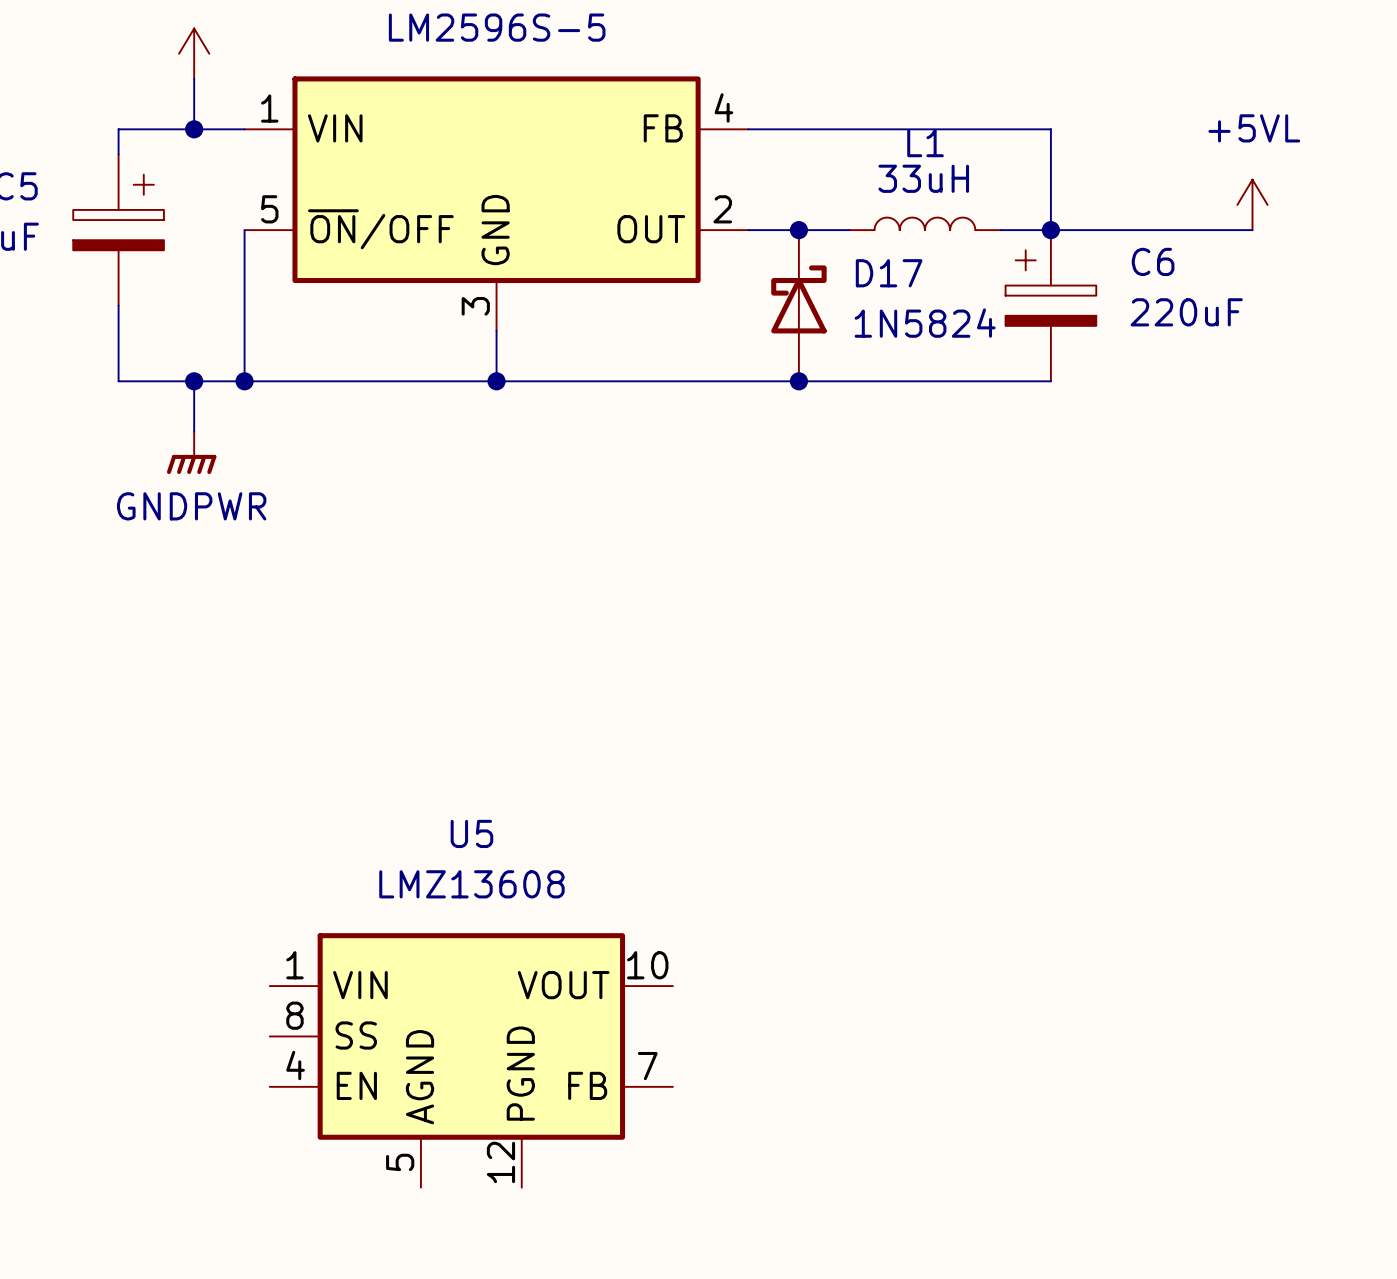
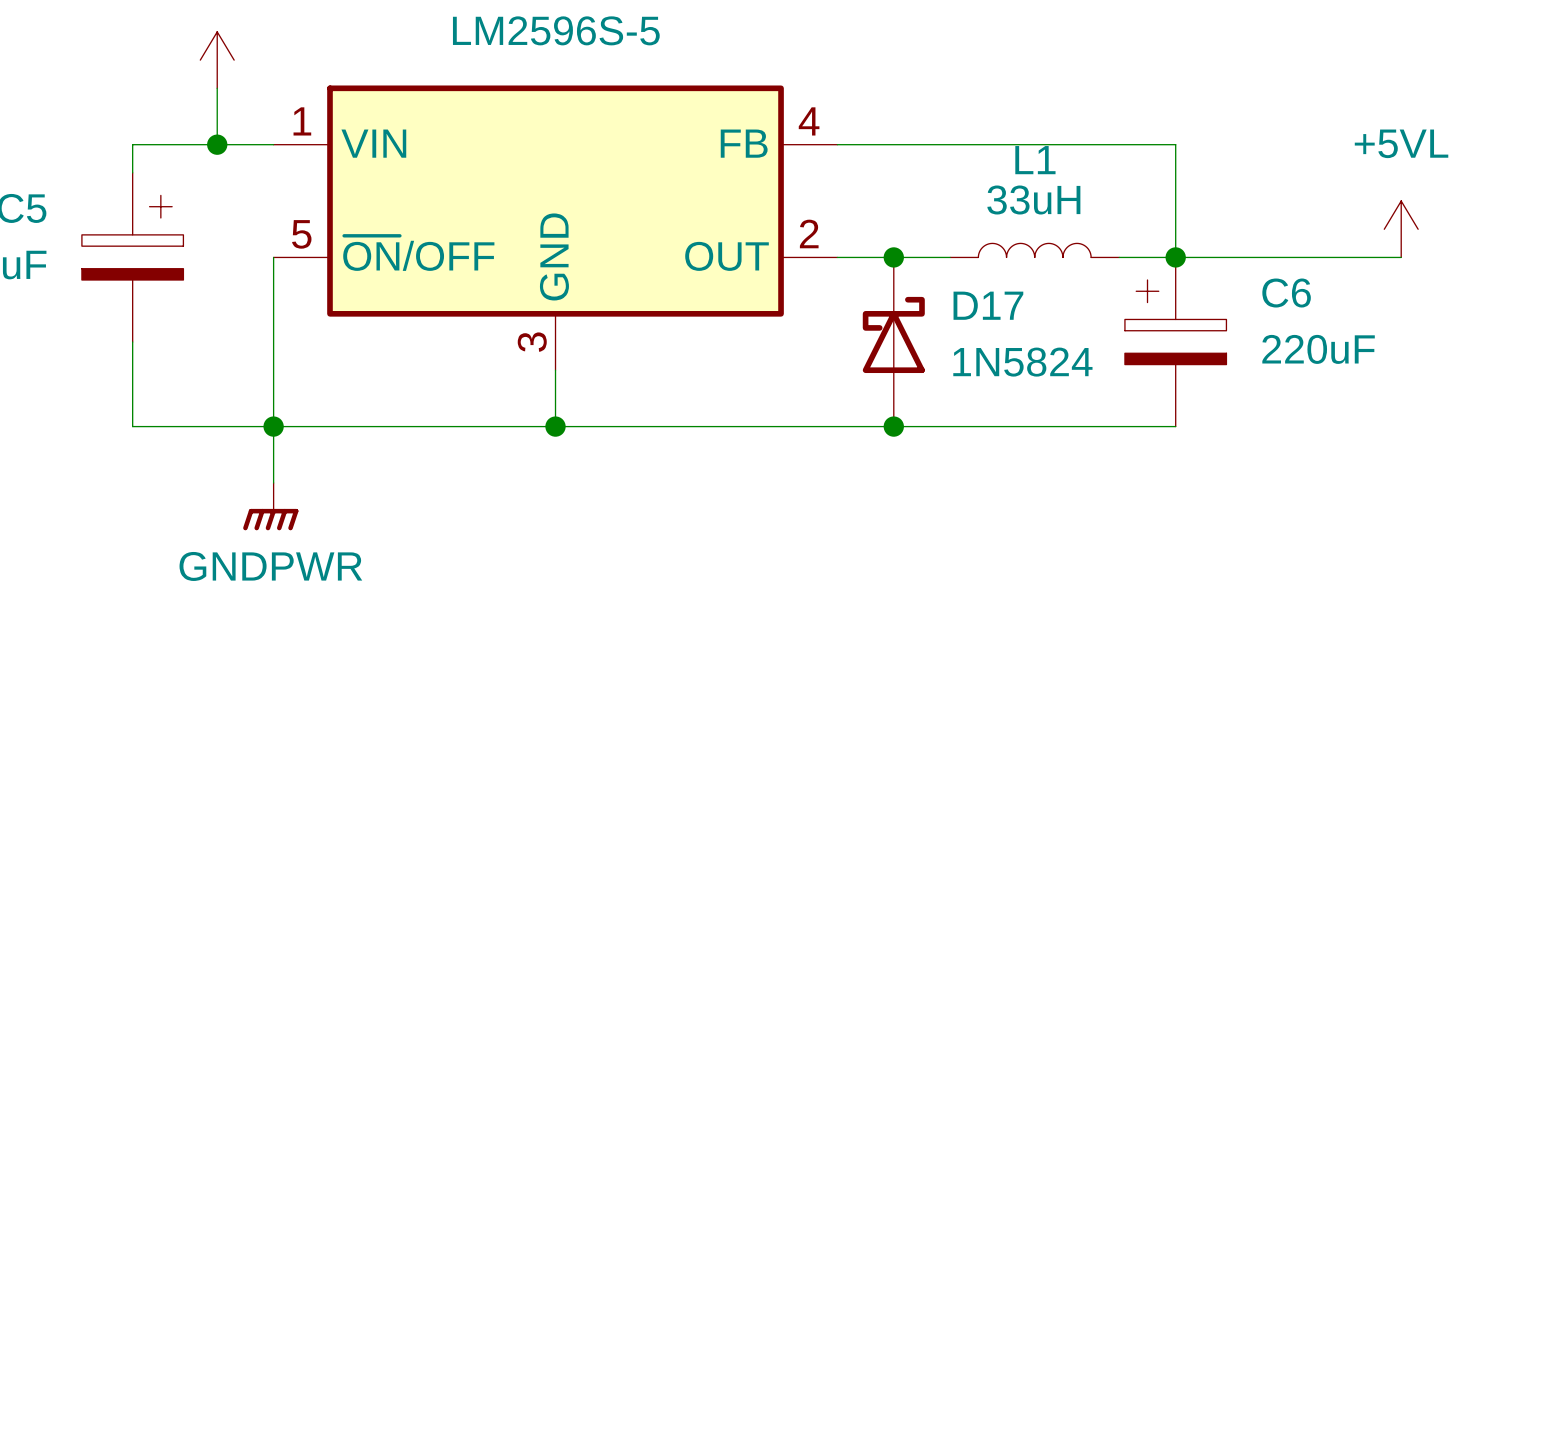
wire: (194, 381) (194, 431) -> (273, 426) (273, 482)
junction: (194, 381) -> none
power symbol position: GNDPWR (191, 452) -> GNDPWR (270, 506)
U5: LMZ13608 (471, 1060) -> none

